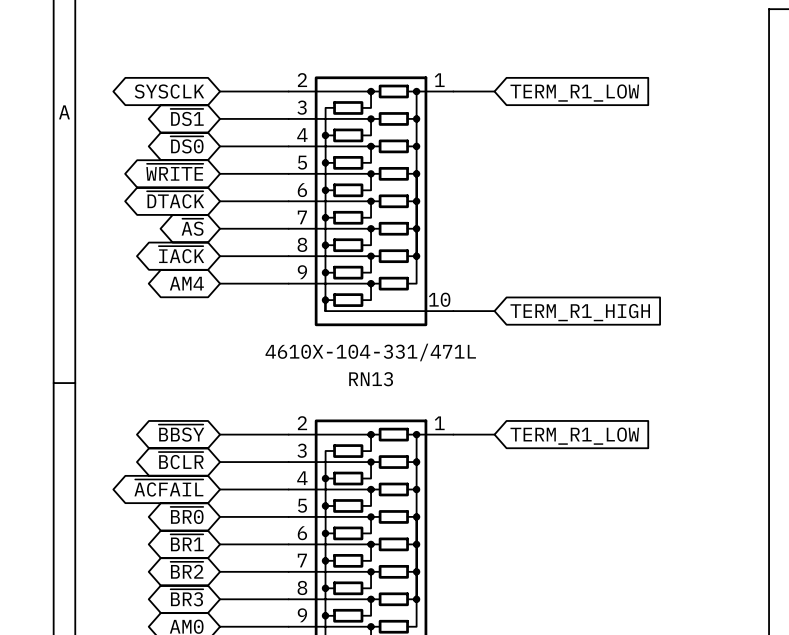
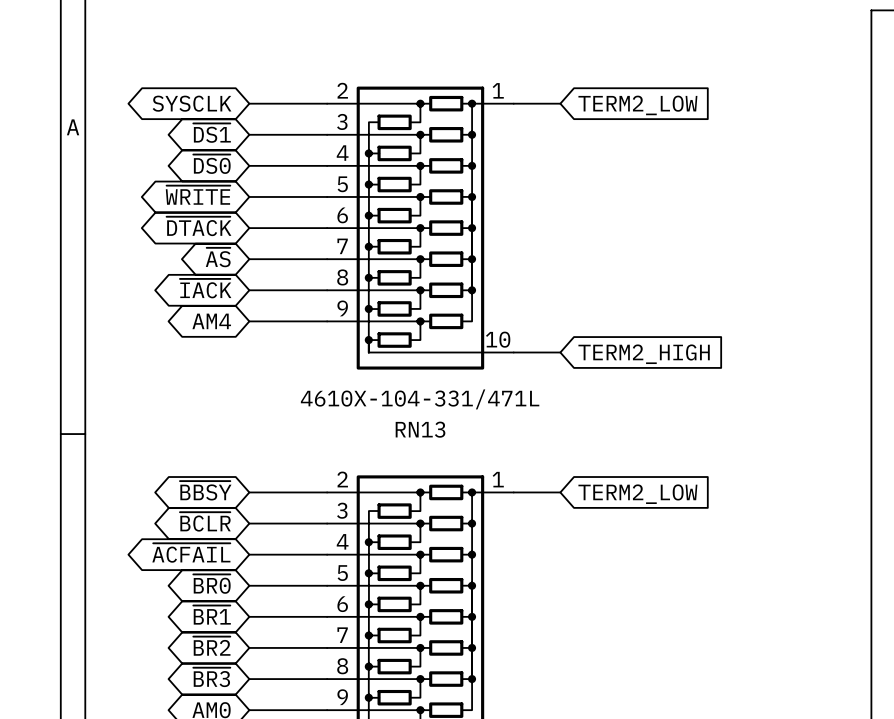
global label: TERM_R1_LOW (574, 93) -> TERM2_LOW (637, 105)
global label: TERM_R1_HIGH (580, 312) -> TERM2_HIGH (644, 354)
global label: TERM_R1_LOW (574, 436) -> TERM2_LOW (637, 494)

